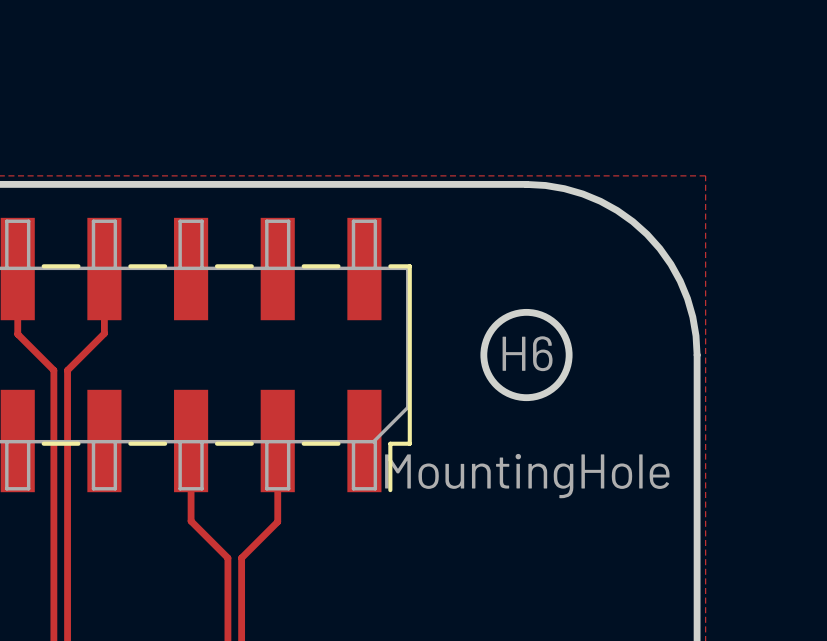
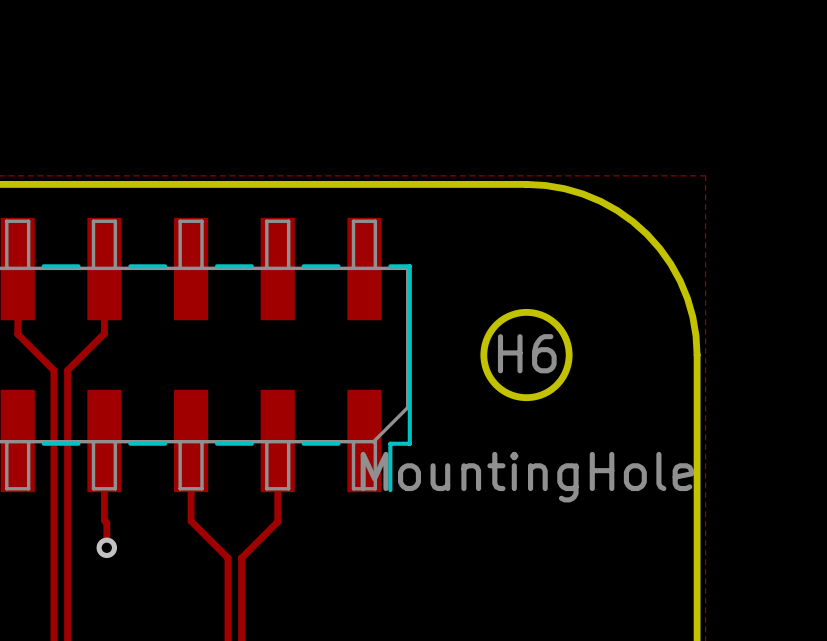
track: none -> (104, 441) (104, 520) (106, 522) (106, 547)
via: none -> (106, 547)

